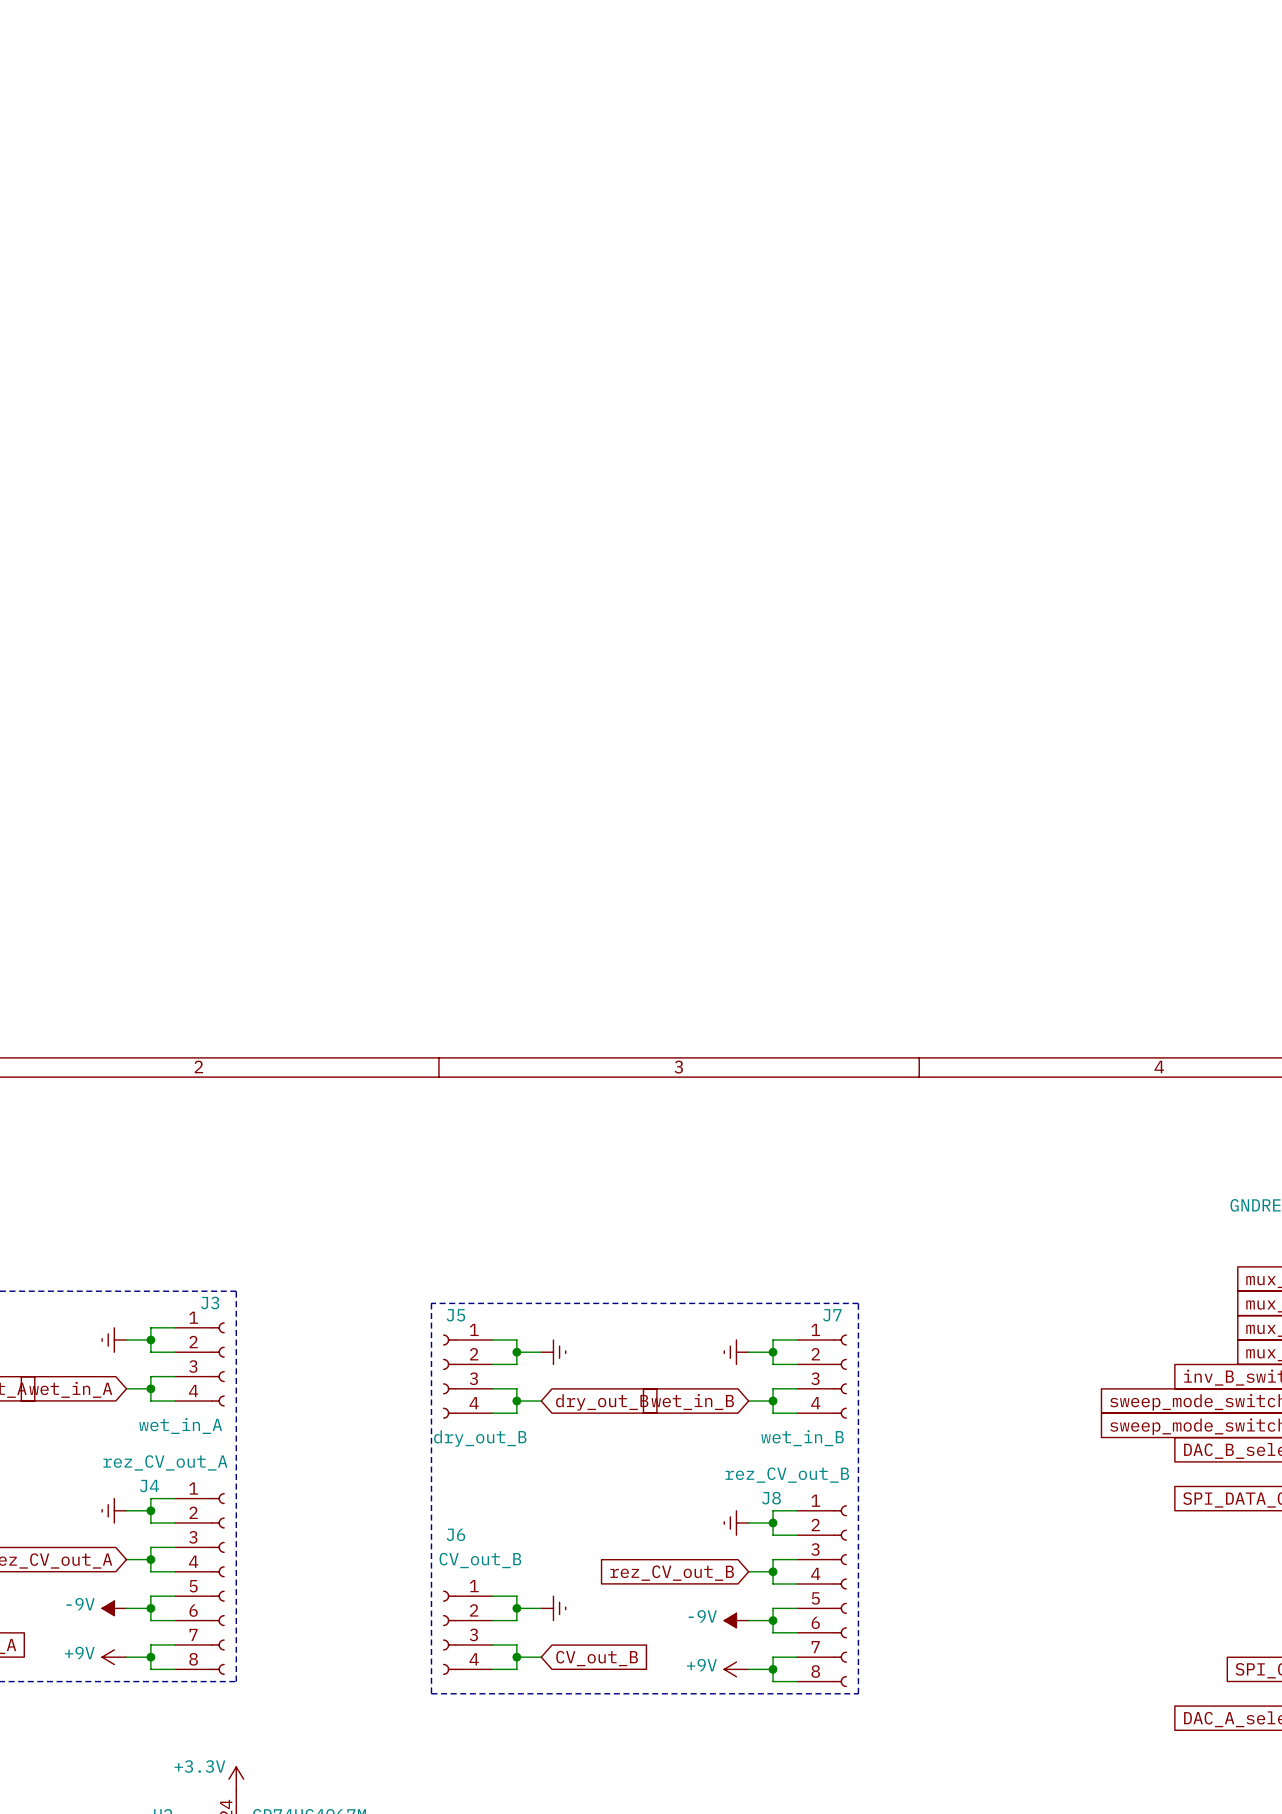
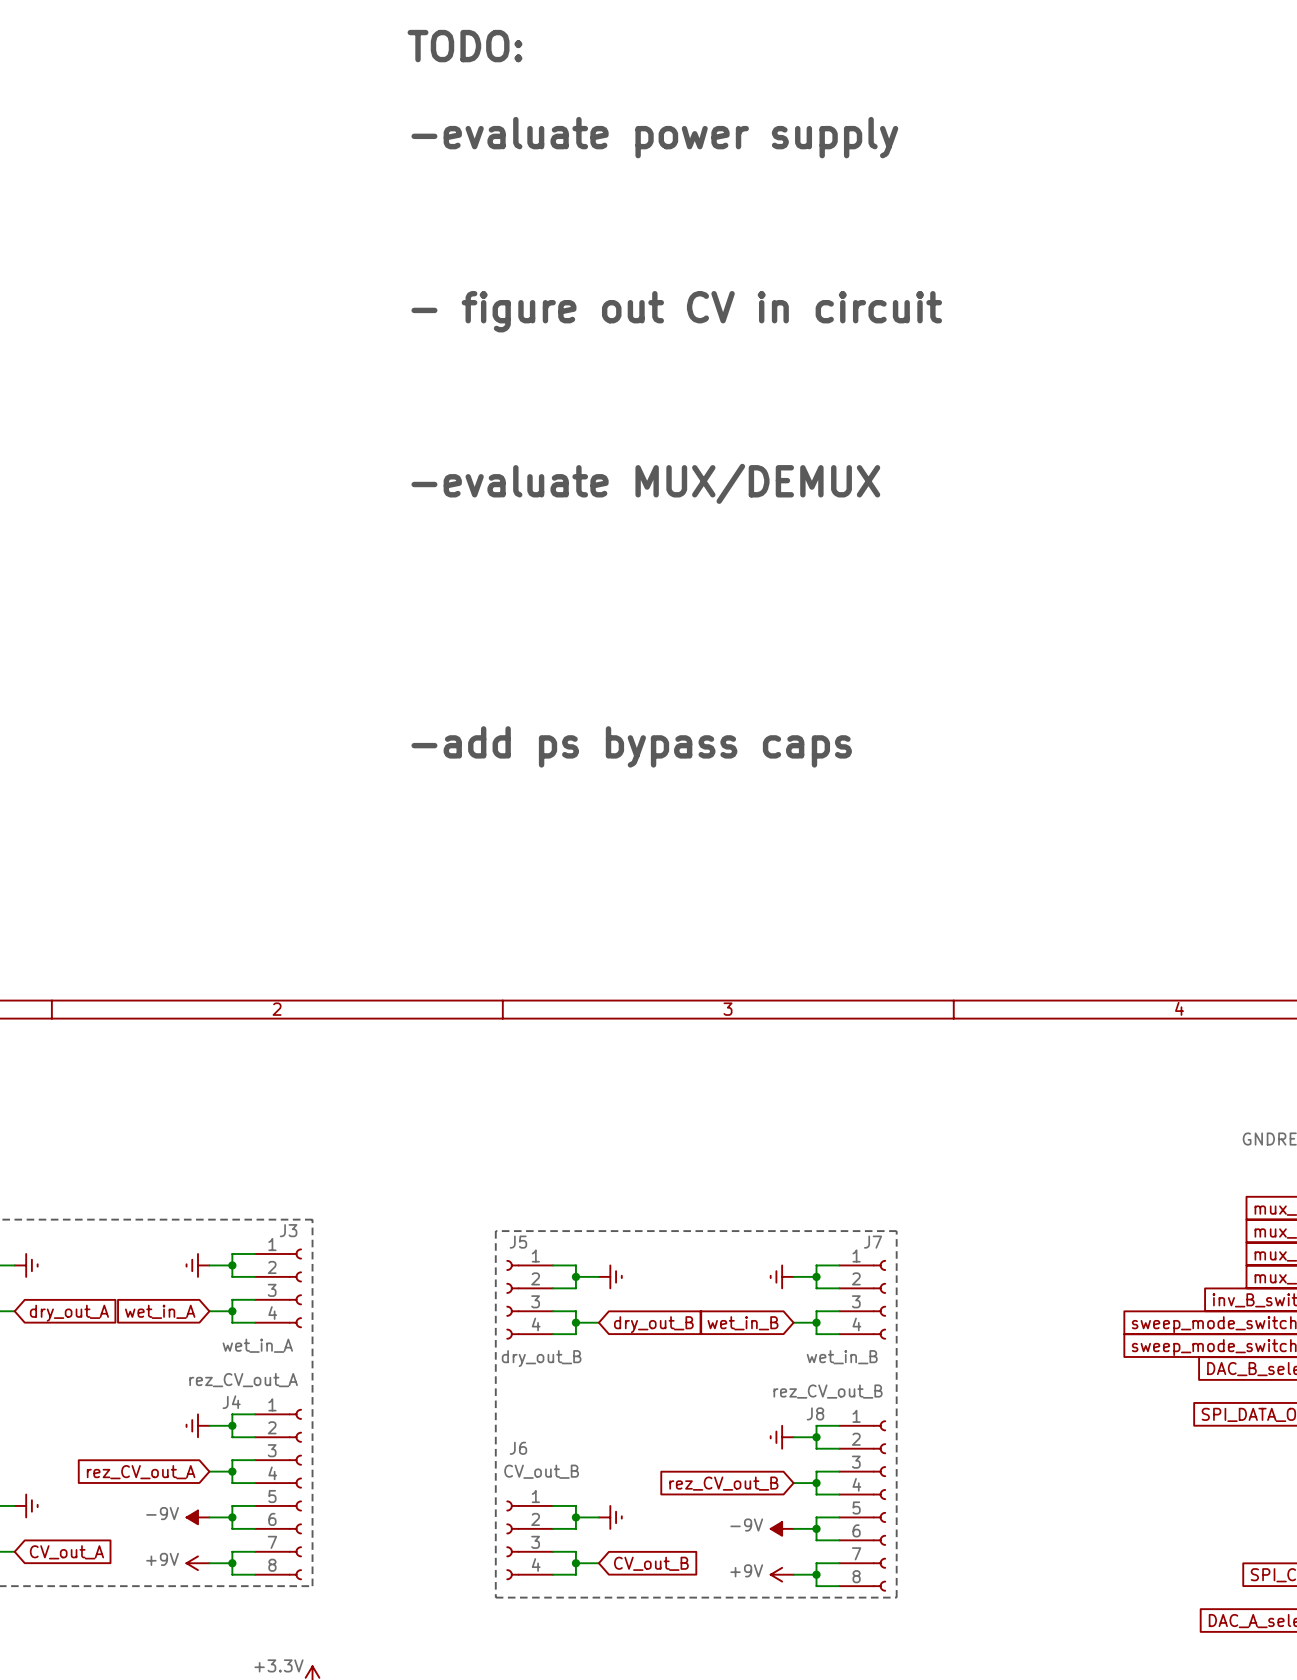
text: none -> TODO: (465, 46)
text: none -> -evaluate power supply (654, 137)
text: none -> - figure out CV in circuit (676, 311)
text: none -> -evaluate MUX/DEMUX (645, 483)
text: none -> -add ps bypass caps (631, 746)

